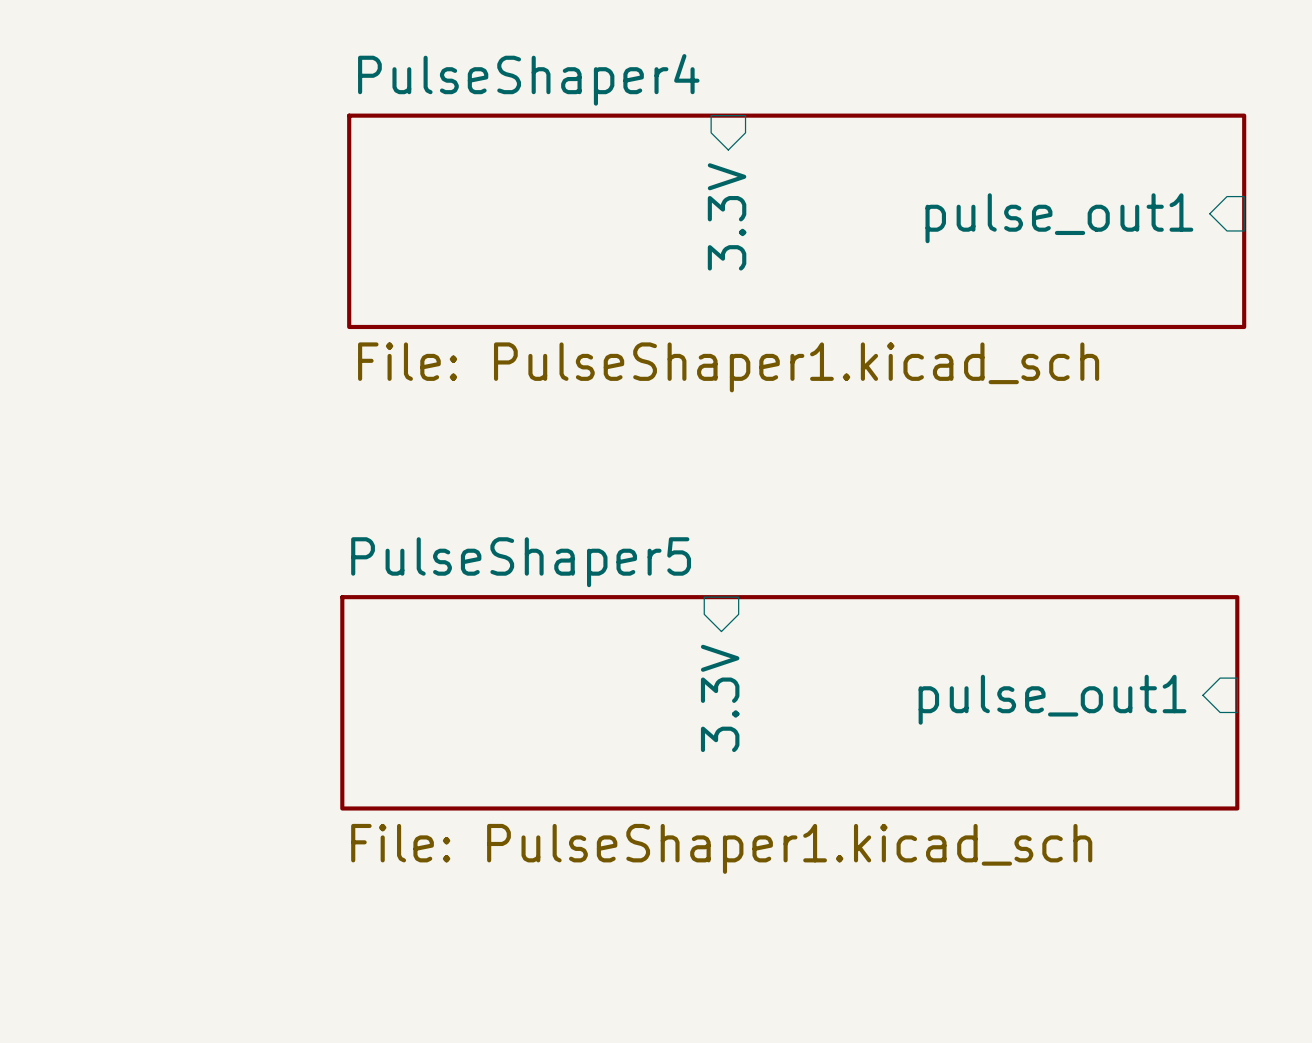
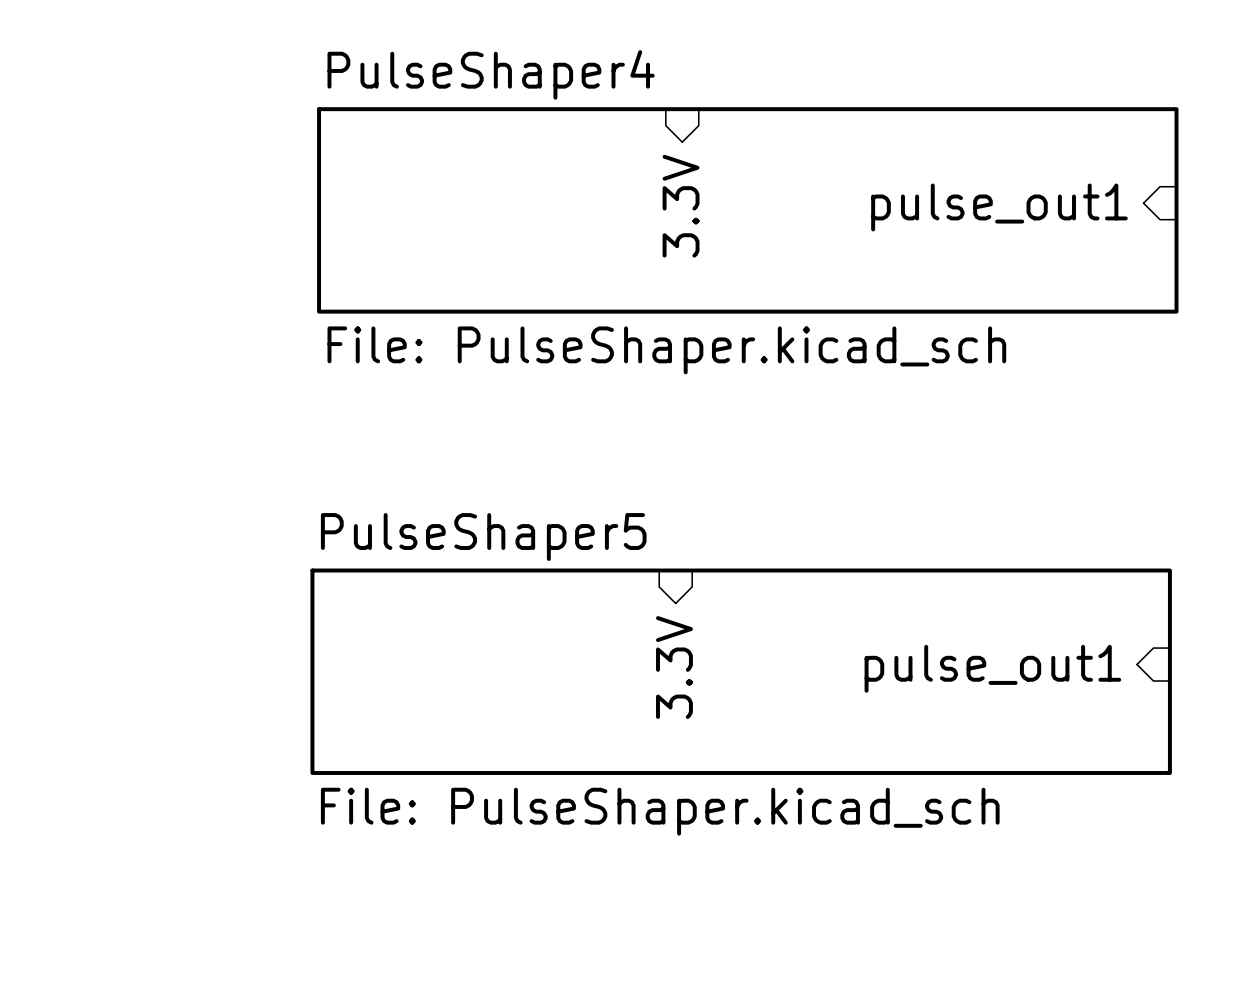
sheet PulseShaper4 value: File: PulseShaper1.kicad_sch (728, 367) -> File: PulseShaper.kicad_sch (666, 350)
sheet PulseShaper5 value: File: PulseShaper1.kicad_sch (721, 848) -> File: PulseShaper.kicad_sch (660, 811)

